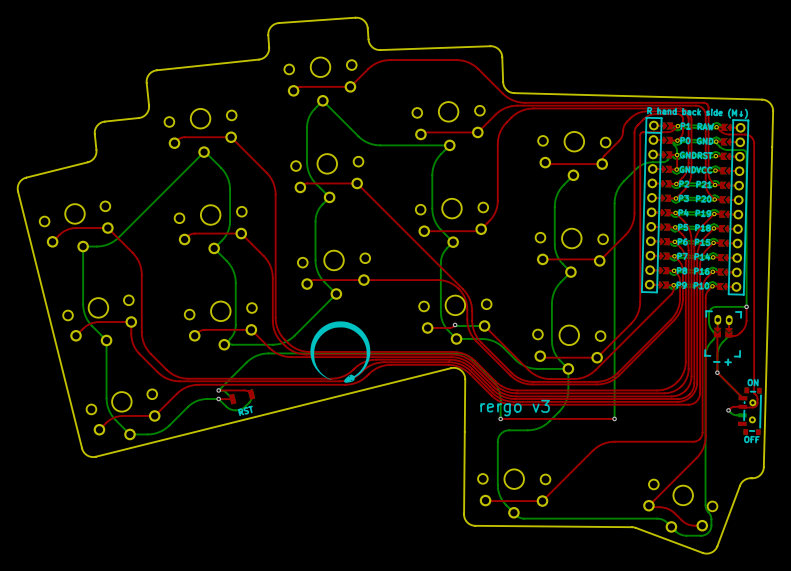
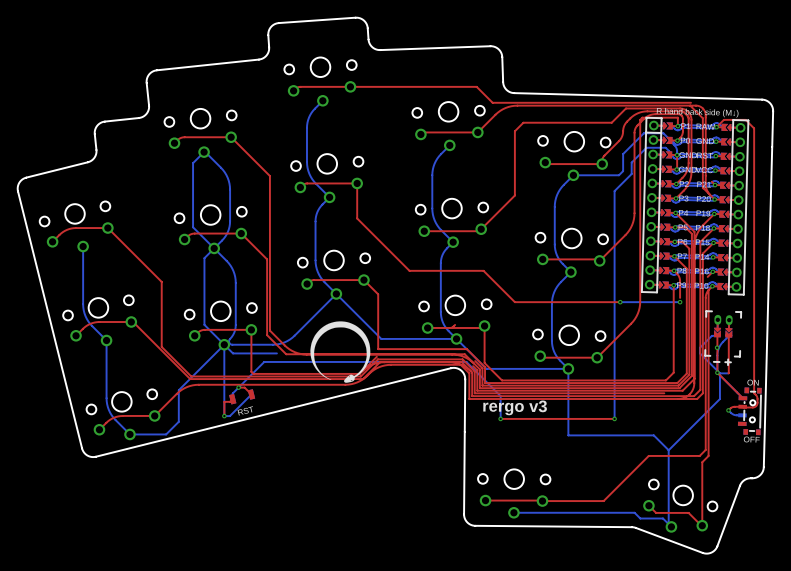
top track: (350, 86) (370, 67) (384, 60) (459, 60) (476, 67) (507, 97) (524, 102) -> (350, 86) (476, 86) (492, 102) (524, 102)
bottom track: (322, 100) (360, 138) (371, 144) (449, 145) -> none
top track: (690, 102) (704, 102) (708, 106) (708, 173) (711, 181) -> none
top track: none -> (690, 105) (702, 118) (702, 188) (710, 195)
top track: (625, 108) (530, 108) (513, 115) (503, 126) (498, 138) (497, 203) (495, 211) (489, 220) -> (625, 108) (611, 122) (523, 122) (514, 131) (514, 195) (489, 220)
top track: (677, 126) (670, 131) (643, 132) (640, 135) -> (677, 126) (677, 117) (642, 117) (640, 119) (640, 135)
top track: (716, 127) (725, 134) (748, 135) (752, 138) (754, 143) -> (716, 127) (723, 119) (745, 119) (754, 128) (754, 143)
bottom track: none -> (672, 141) (663, 133) (643, 133) (623, 154) (623, 171) (618, 175) (573, 175)
bottom track: (716, 141) (723, 149) (743, 150) (746, 153) (746, 306) (714, 307) (709, 312) (709, 325) (714, 335) (707, 348) (705, 356) (705, 505) (711, 516) (710, 529) (703, 535) (684, 535) (678, 533) (671, 526) -> none
bottom track: (669, 154) (665, 161) (648, 162) (637, 167) (619, 186) (614, 203) -> (669, 154) (669, 151) (665, 147) (646, 147) (631, 162) (631, 173) (614, 191) (614, 203)
bottom track: (193, 163) (116, 239) (102, 245) (83, 246) -> (193, 163) (193, 227) (214, 248) (204, 258) (204, 324) (233, 353) (268, 353)
top track: (266, 172) (271, 179) (275, 191) (275, 320) (279, 332) (290, 344) (297, 349) (309, 351) (456, 352) (467, 355) (475, 361) -> none
top track: (357, 183) (465, 291) (470, 302) (472, 326) (477, 337) (511, 372) (524, 380) (596, 381) (610, 378) (673, 317) (677, 309) (680, 297) -> (357, 183) (357, 218) (409, 270) (483, 270) (514, 302) (620, 302)
top track: (683, 220) (689, 229) (691, 240) (691, 376) (688, 386) (683, 392) (671, 396) (513, 396) (498, 391) (477, 370) -> (683, 220) (694, 231) (694, 378) (682, 390) (477, 390) (477, 370)
top track: (675, 227) (684, 237) (688, 248) (688, 371) (681, 386) (673, 391) (664, 393) -> (675, 227) (685, 227) (691, 233) (691, 375) (679, 388) (479, 388) (479, 369)
top track: (705, 236) (700, 243) (697, 254) (697, 384) (693, 394) (687, 399) (677, 401) (511, 401) (494, 394) (472, 372) -> (705, 236) (700, 242) (700, 389) (694, 396) (472, 396) (472, 372)
top track: (674, 241) (682, 250) (685, 258) (685, 361) (682, 375) (673, 385) (657, 390) (514, 390) (500, 385) (482, 368) -> (674, 241) (682, 241) (689, 248) (689, 374) (678, 385) (482, 385) (482, 368)
top track: (706, 249) (701, 257) (700, 266) (699, 394) (697, 400) (692, 403) (507, 404) (493, 397) (465, 370) (447, 364) -> (706, 249) (702, 253) (702, 393) (697, 399) (678, 399)
top track: (132, 252) (138, 260) (141, 271) (141, 332) (144, 343) (148, 351) (166, 369) (179, 377) (334, 378) (346, 375) (364, 362) (376, 359) (453, 359) (464, 363) (471, 368) -> (132, 252) (161, 281) (161, 346) (191, 376) (360, 376) (377, 359) (462, 359) (471, 368)
top track: (263, 256) (272, 271) (272, 323) (276, 335) (281, 342) -> (266, 172) (269, 176) (269, 330) (281, 342)
top track: none -> (263, 256) (267, 259) (267, 335) (286, 354) (464, 354) (474, 363)
top track: (678, 260) (682, 268) (682, 298) (677, 315) (616, 377) (600, 384) (529, 384) (515, 379) (472, 336) (467, 325) (465, 298) (458, 288) (449, 282) (437, 280) (363, 280) -> (678, 260) (686, 268) (686, 373) (677, 383) (485, 383) (485, 367) (466, 349) (378, 349) (378, 294) (363, 280)
top track: (707, 276) (702, 289) (702, 432) (699, 439) (693, 441) (605, 443) (592, 450) (542, 501) (485, 500) -> (705, 436) (705, 449) (699, 455) (648, 455) (603, 501) (485, 500)
top track: (673, 288) (671, 294) (595, 369) (579, 378) (547, 378) (535, 375) (484, 326) -> (673, 288) (673, 372) (665, 380) (502, 380) (484, 362) (484, 326) (482, 327) (449, 327)
top track: none -> (709, 289) (708, 455) (702, 462) (702, 525)
bottom track: none -> (620, 302) (680, 302)
via: none -> (620, 302)
via: none -> (680, 302)
top track: (746, 306) (744, 328) (738, 334) (728, 336) -> (728, 373) (728, 336)
via: (746, 306) -> none
top track: (131, 322) (132, 342) (139, 354) -> (131, 322) (190, 379) (363, 379) (380, 361) (461, 361) (470, 371)
bottom track: (455, 324) (484, 326) -> none
via: (455, 324) -> none
top track: (251, 329) (271, 350) (285, 356) (454, 357) (463, 359) (473, 366) -> (251, 329) (251, 371) (253, 373) (359, 373) (361, 372)
bottom track: none -> (717, 335) (711, 335) (700, 347) (700, 353) (719, 373)
bottom track: (456, 338) (484, 339) (493, 341) (520, 363) (537, 368) -> (336, 293) (381, 338) (456, 338) (486, 368) (537, 368)
via: none -> (717, 347)
top track: (138, 353) (162, 376) (176, 381) (339, 381) (351, 378) (361, 372) -> none
bottom track: (268, 353) (259, 354) (248, 360) (218, 390) (224, 391) (232, 399) -> none
bottom track: (276, 353) (461, 353) (471, 358) (493, 380) (498, 388) (500, 400) -> (232, 399) (232, 393) (264, 361) (466, 361) (500, 396) (500, 400)
top track: (479, 369) (499, 388) (516, 393) -> (474, 371) (474, 393) (516, 393)
top track: (474, 371) (497, 393) (515, 399) -> (447, 364) (460, 364) (469, 373) (469, 399) (515, 399)
bottom track: none -> (719, 373) (719, 399) (668, 450)
bottom track: none -> (719, 373) (728, 373)
via: none -> (238, 387)
bottom track: (568, 389) (563, 406) (544, 425) (530, 430) (506, 430) (499, 435) (497, 441) (497, 487) (504, 502) (517, 516) (522, 518) (657, 518) (667, 522) -> (568, 389) (568, 435) (653, 435) (668, 450)
top track: (218, 390) (245, 390) (249, 392) -> (238, 387) (244, 387) (249, 392)
via: (218, 390) -> none
bottom track: (251, 394) (249, 402) (237, 410) (228, 408) (218, 399) (196, 401) (164, 429) (147, 434) -> (224, 416) (224, 344) (178, 390) (178, 421) (166, 434) (147, 434)
bottom track: none -> (251, 394) (229, 416) (224, 416)
top track: (218, 399) (232, 399) -> (224, 416) (224, 401) (230, 401) (232, 399)
via: (218, 399) -> none
via: none -> (224, 416)
top track: (705, 436) (703, 447) (698, 455) (649, 505) (668, 508) (685, 523) (701, 525) -> (648, 505) (656, 512) (688, 512) (701, 525)
bottom track: none -> (668, 450) (668, 524)
bottom track: none -> (513, 512) (634, 512) (640, 518) (663, 518) (667, 522)

